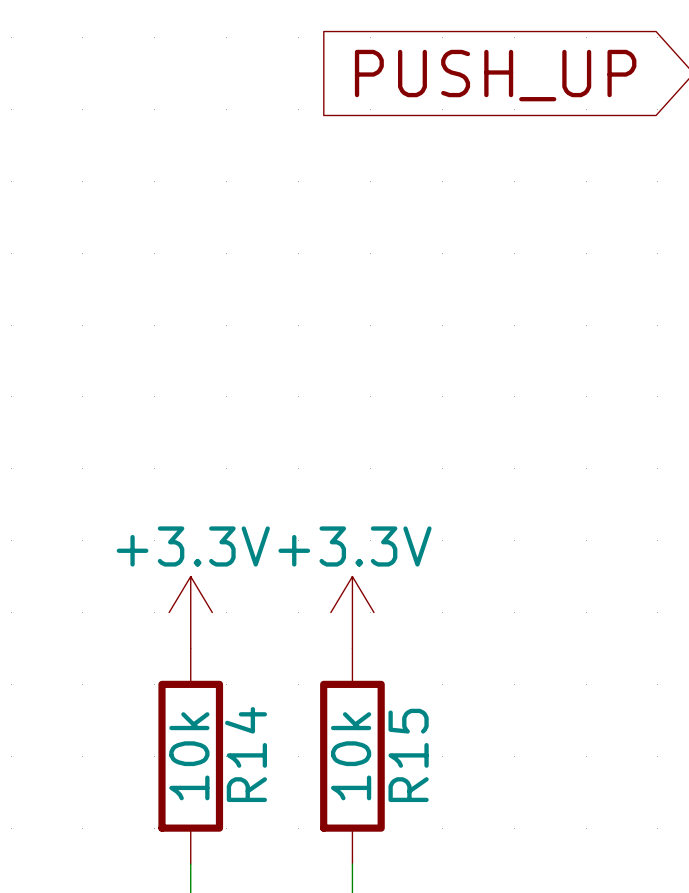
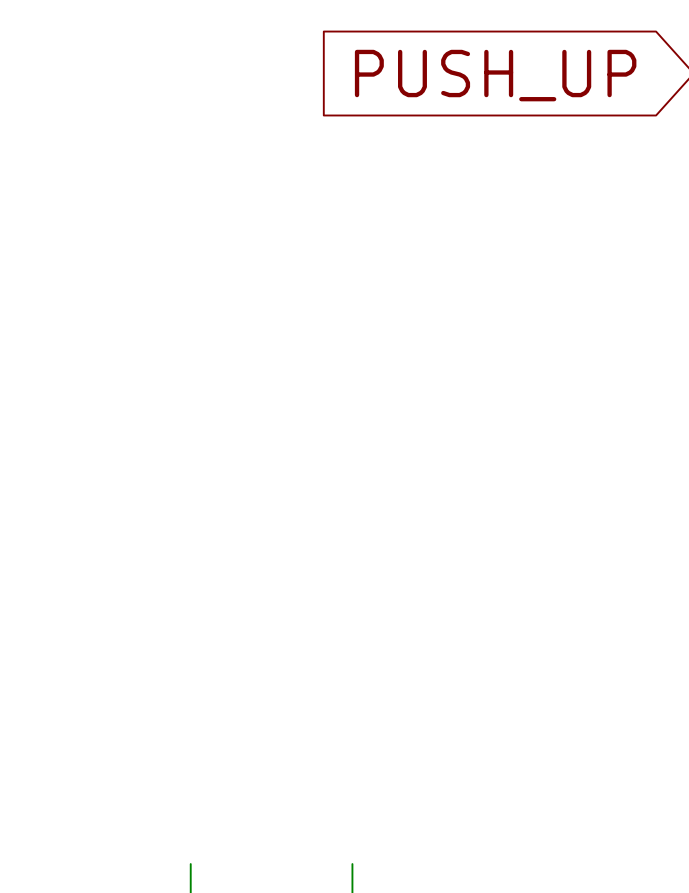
power symbol: +3.3V (190, 612) -> none
power symbol: +3.3V (352, 612) -> none
R14: 10k (190, 756) -> none
R15: 10k (352, 756) -> none

